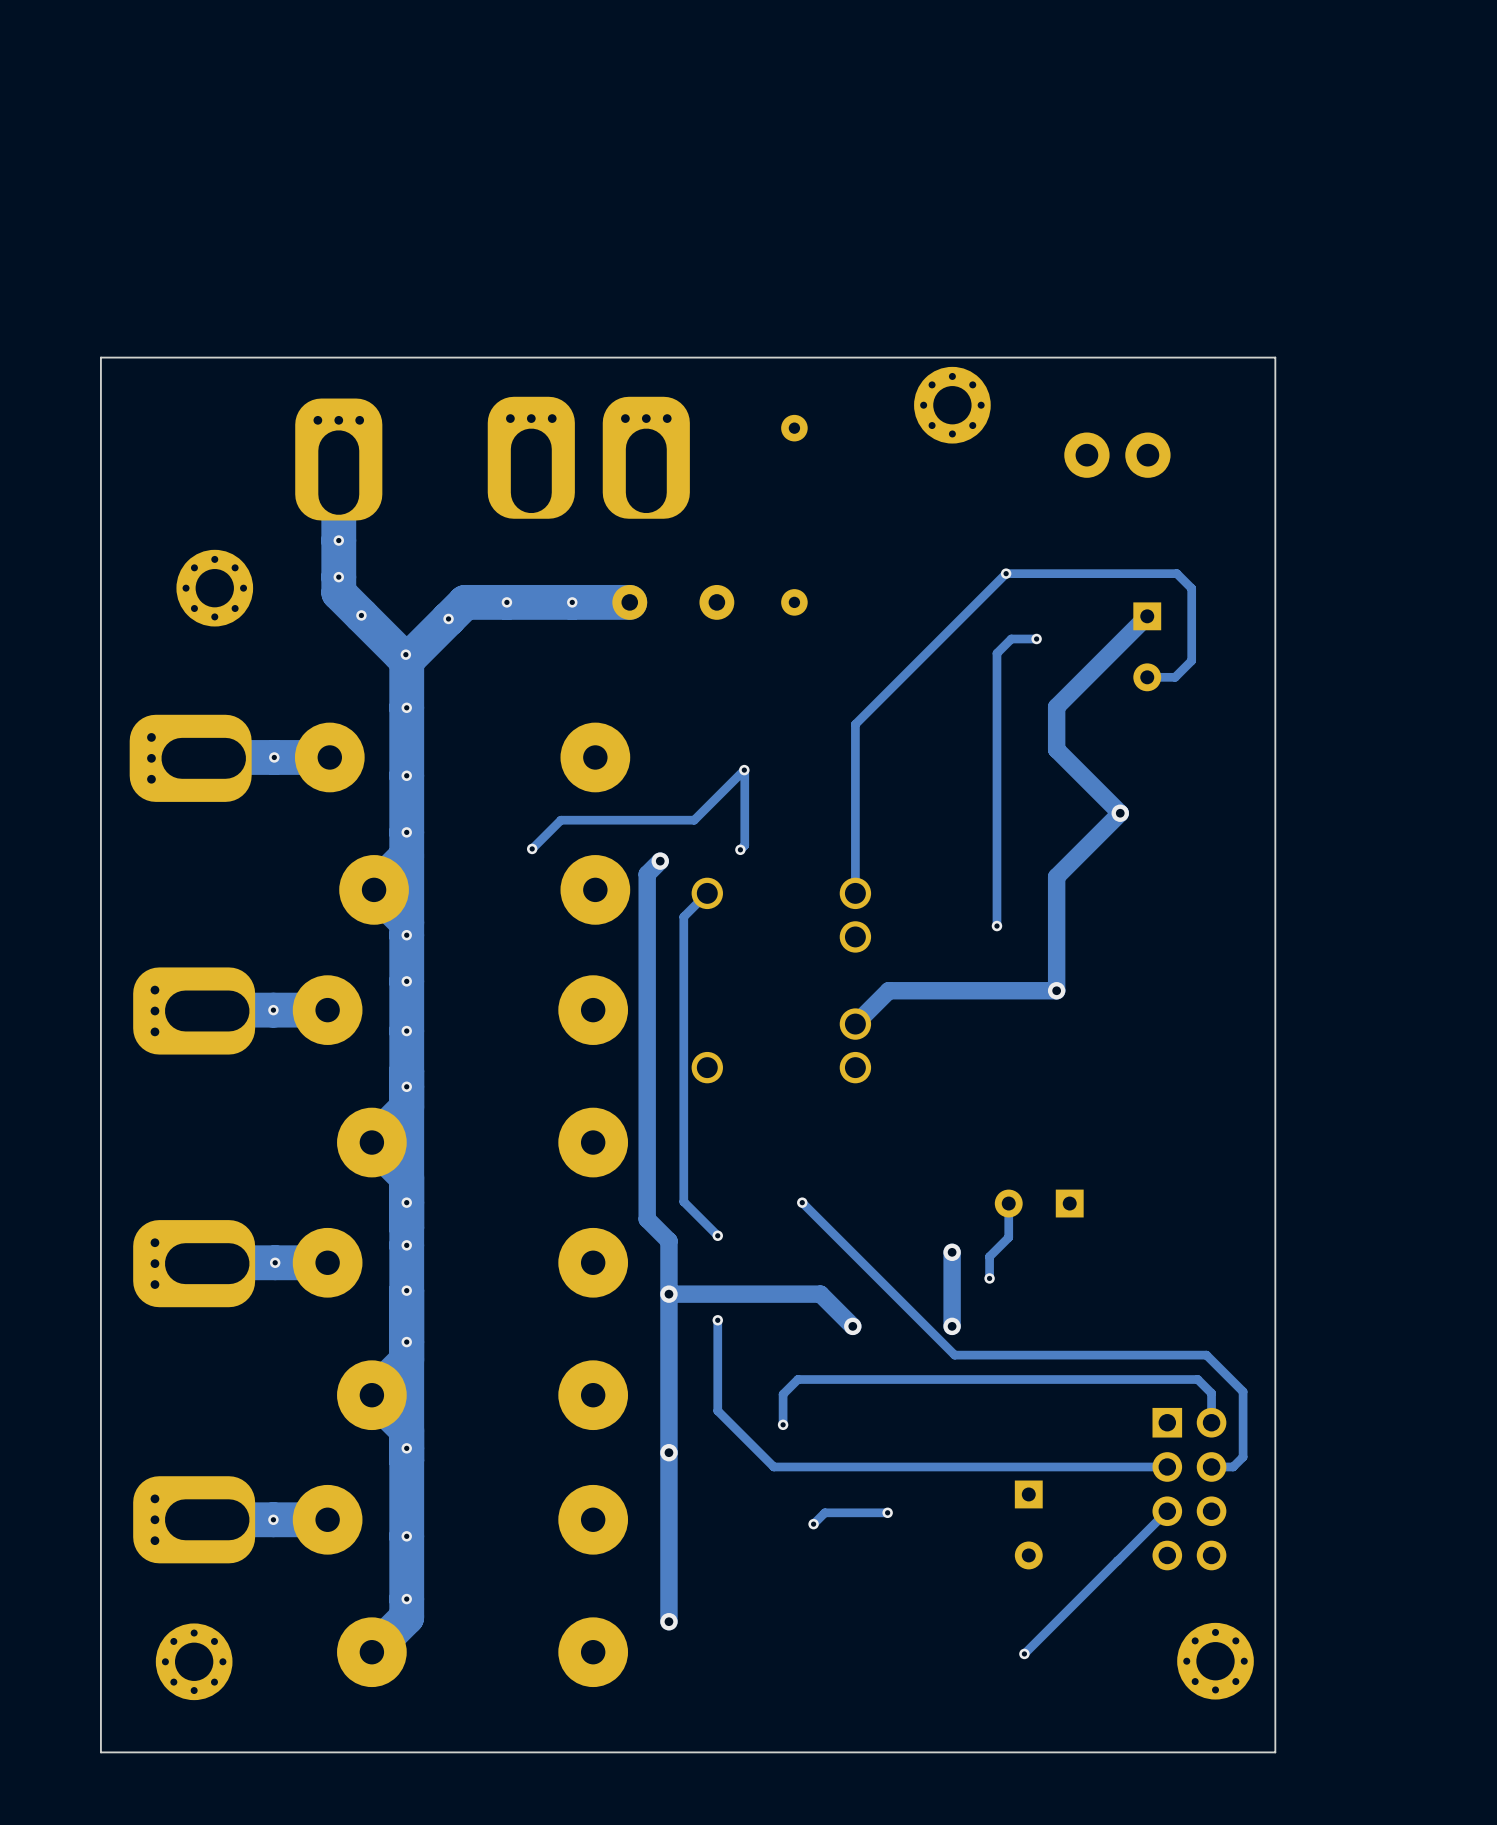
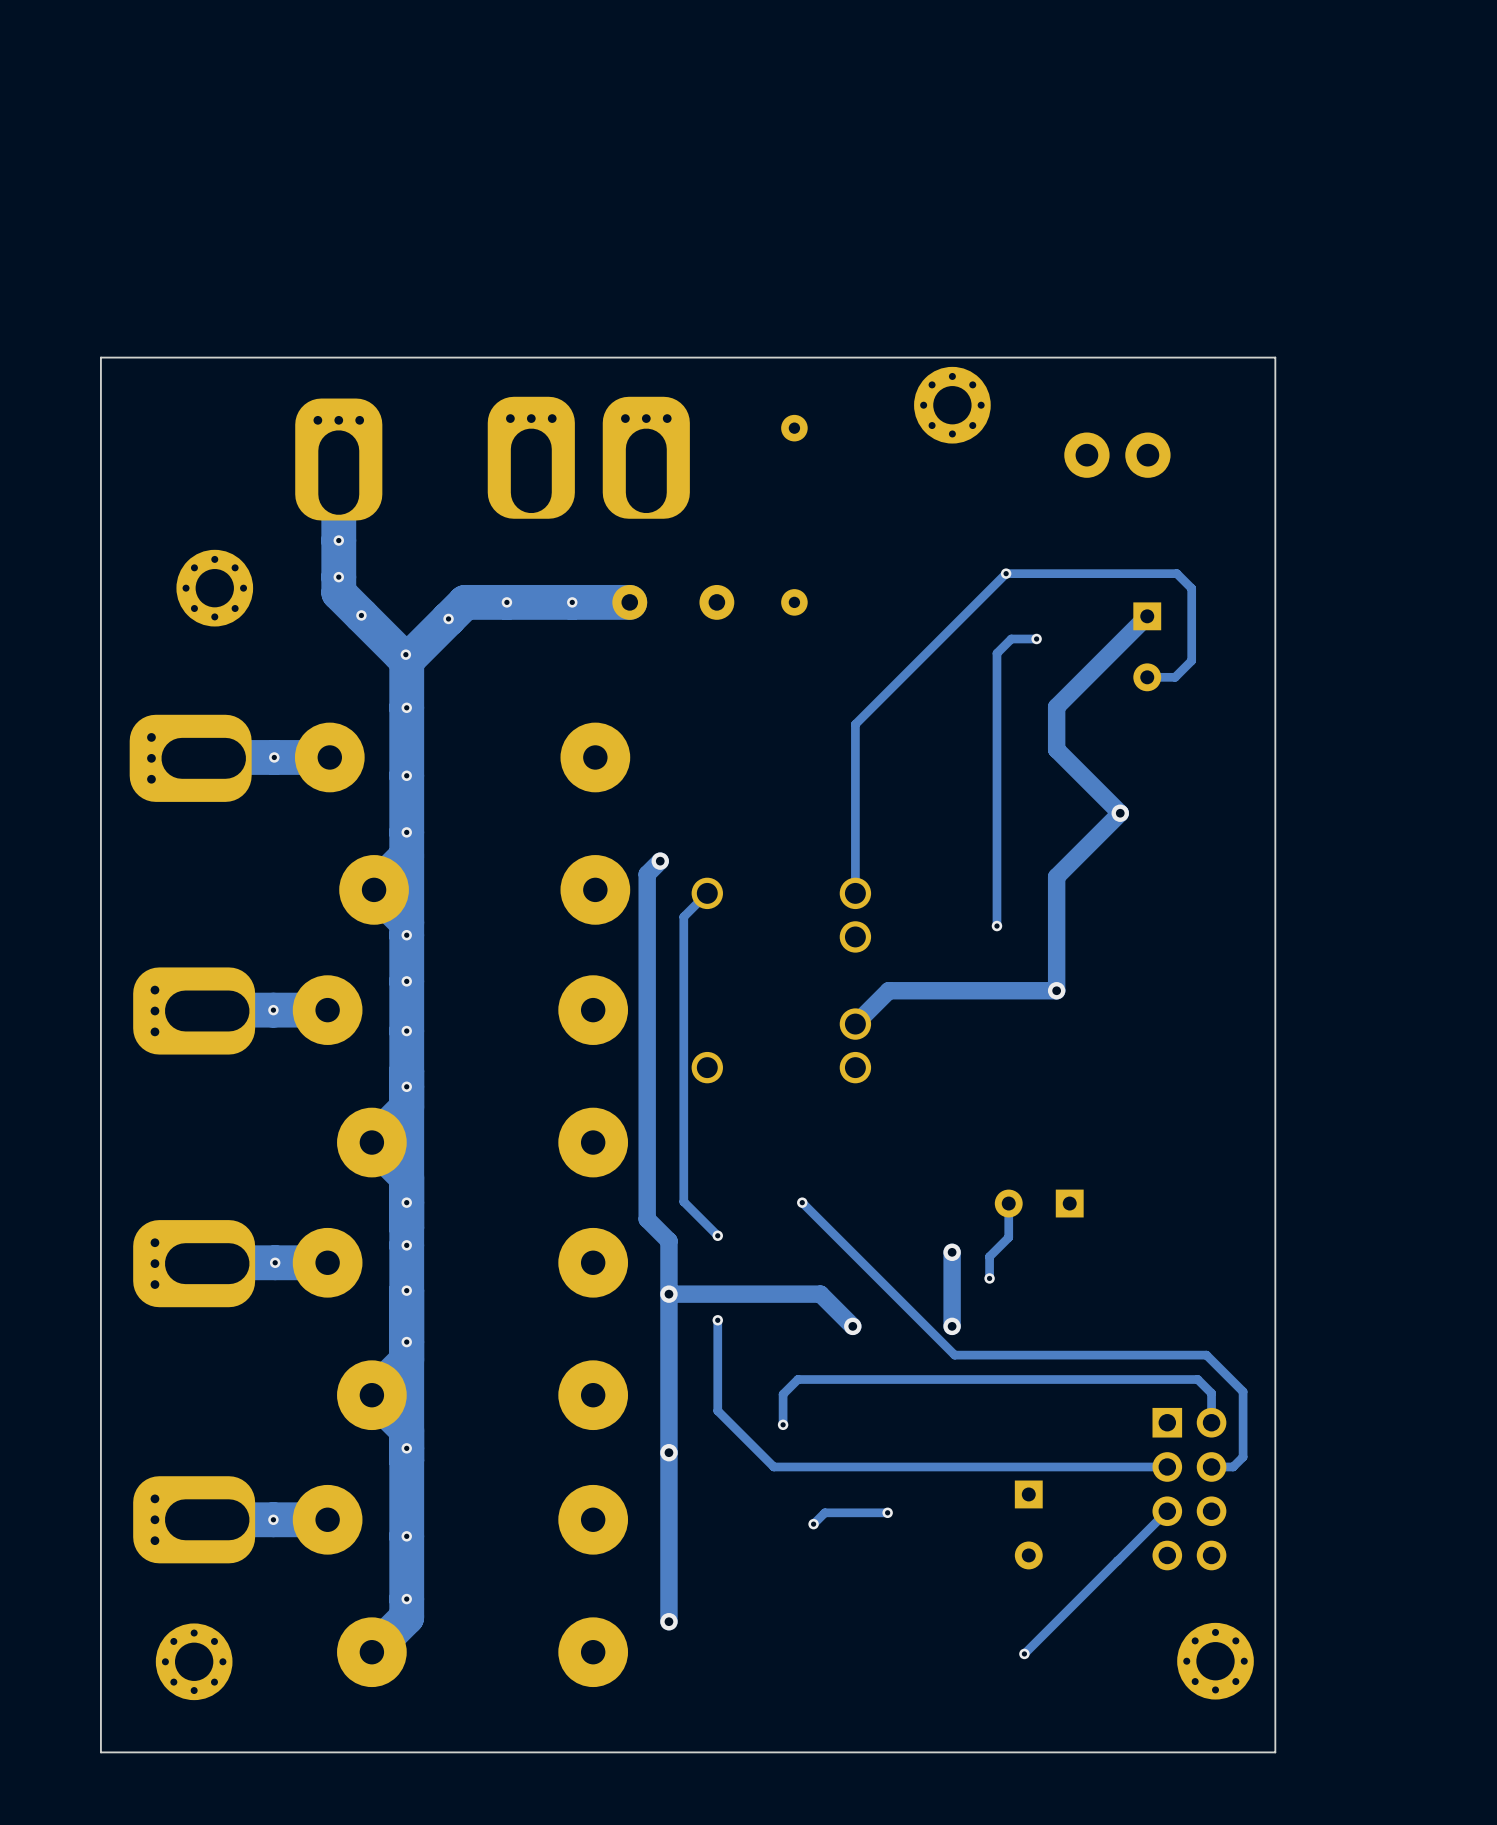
via: (744, 770) -> none
track: (532, 848) (560, 820) (694, 820) (744, 770) (744, 845) (740, 849) -> none
via: (532, 848) -> none
via: (740, 849) -> none

